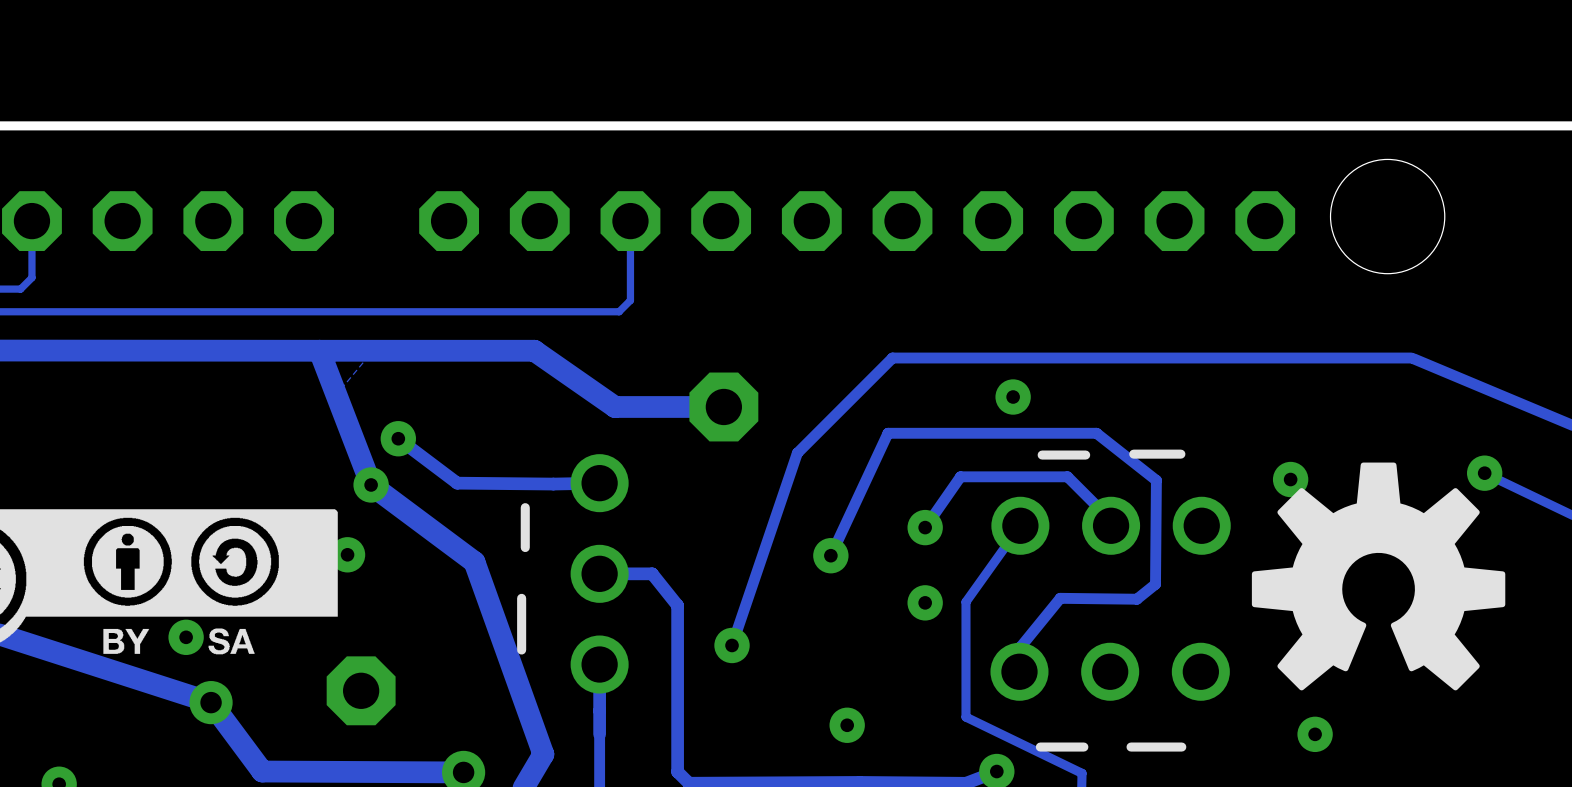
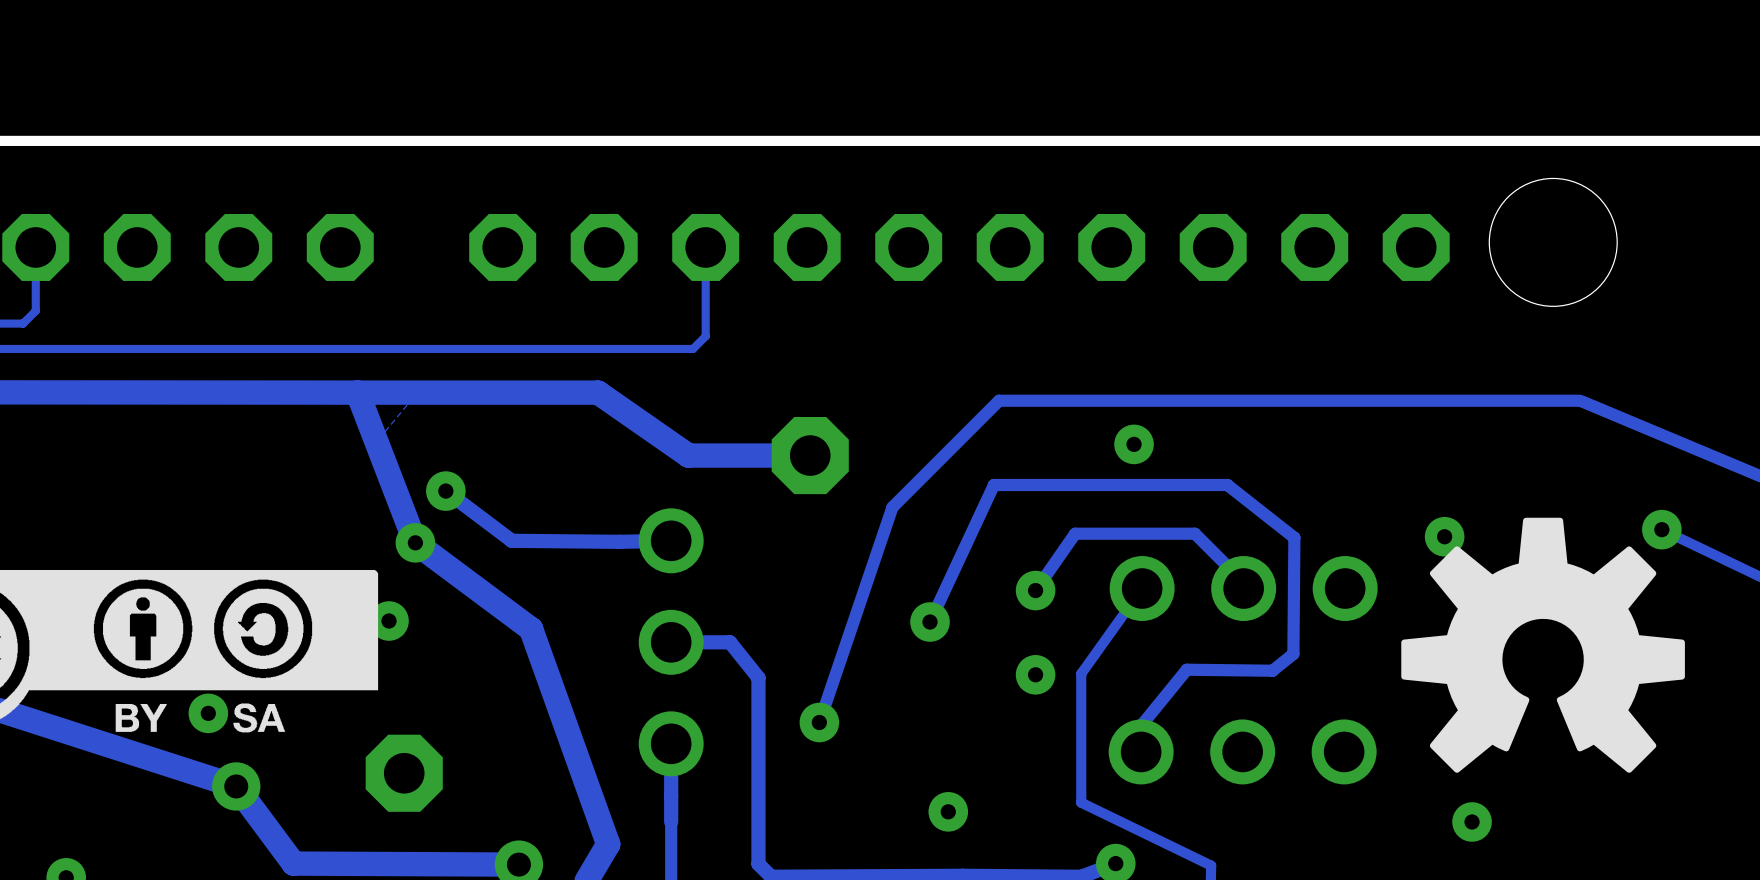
line: (1180, 454) (1133, 454) -> none
line: (1085, 455) (1042, 455) -> none
line: (525, 507) (525, 547) -> none
line: (521, 598) (521, 650) -> none
line: (1083, 747) (1040, 747) -> none
line: (1181, 747) (1131, 747) -> none

